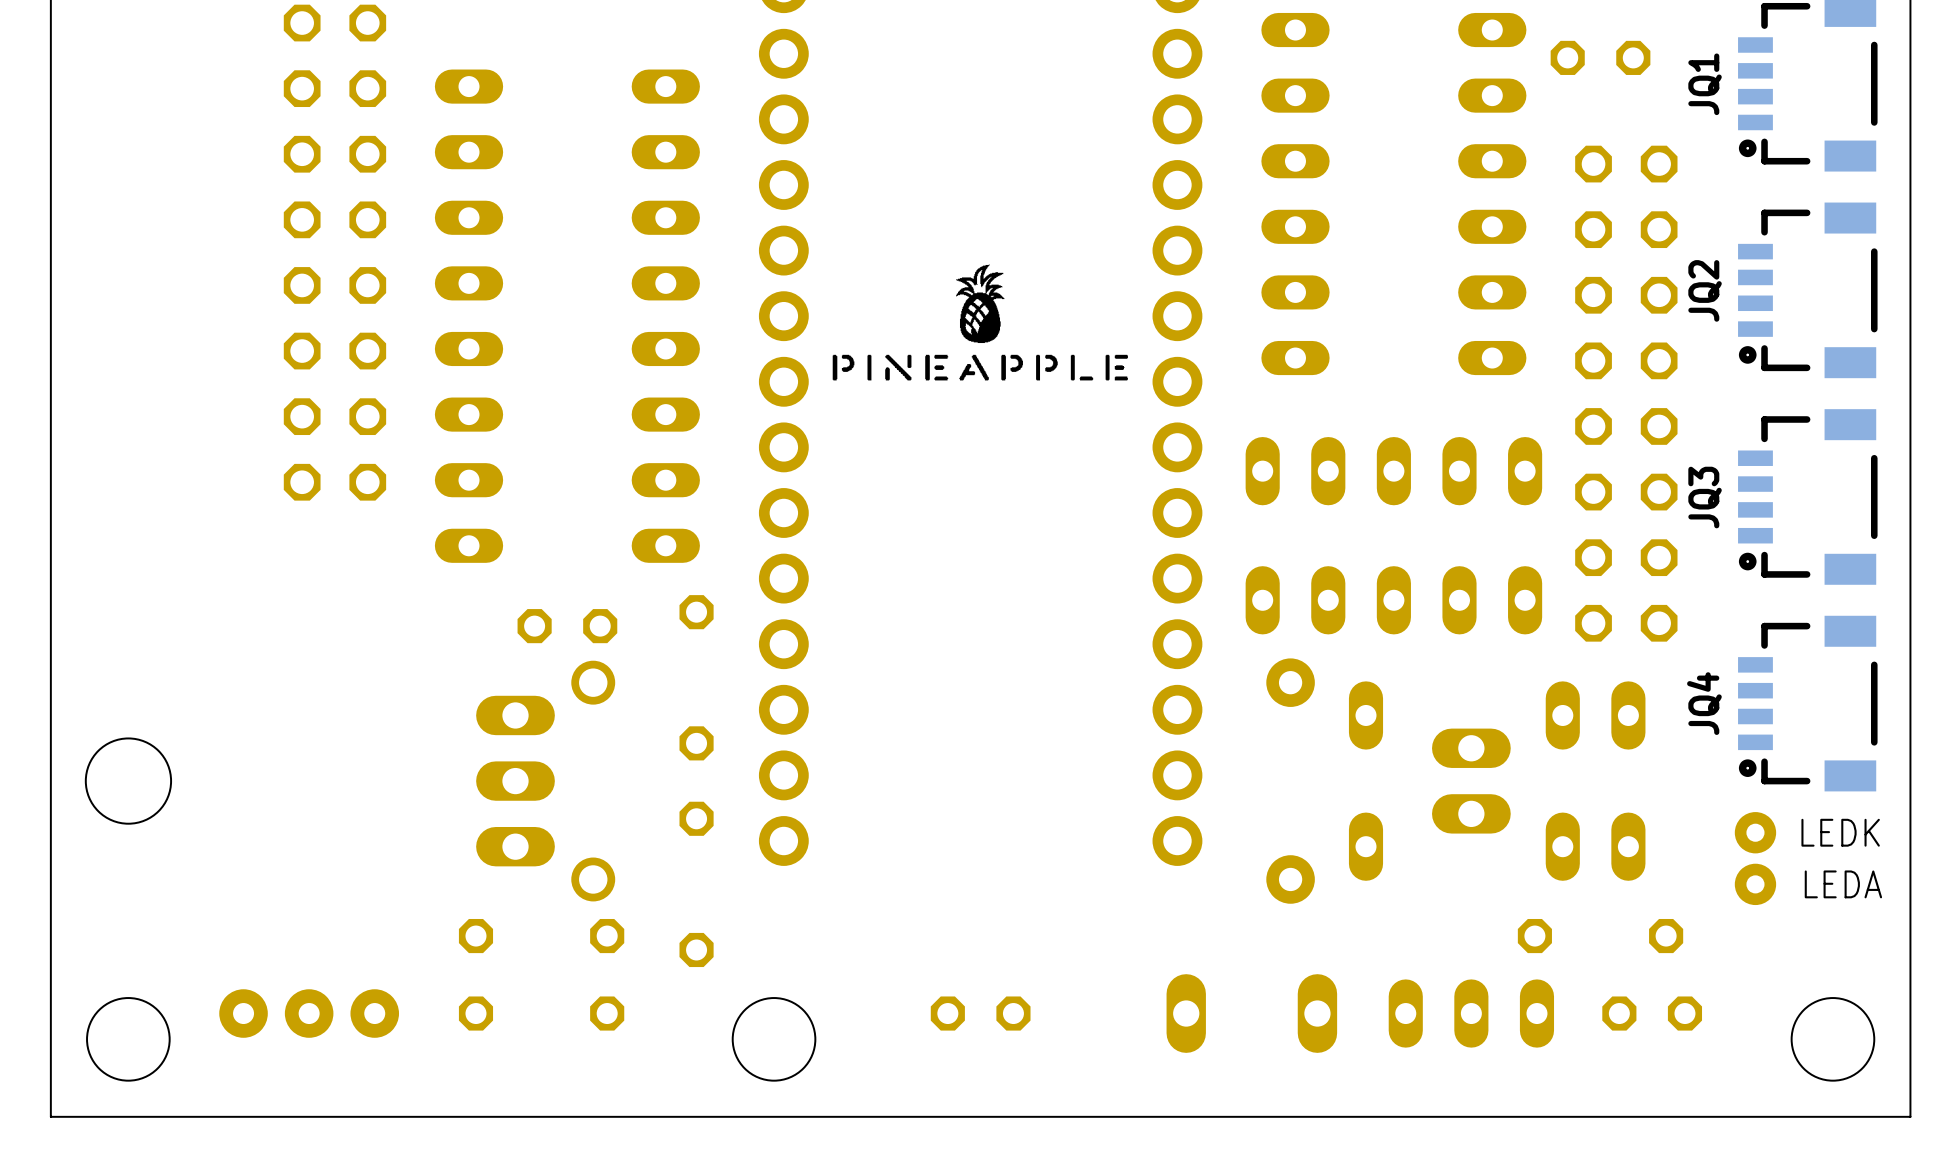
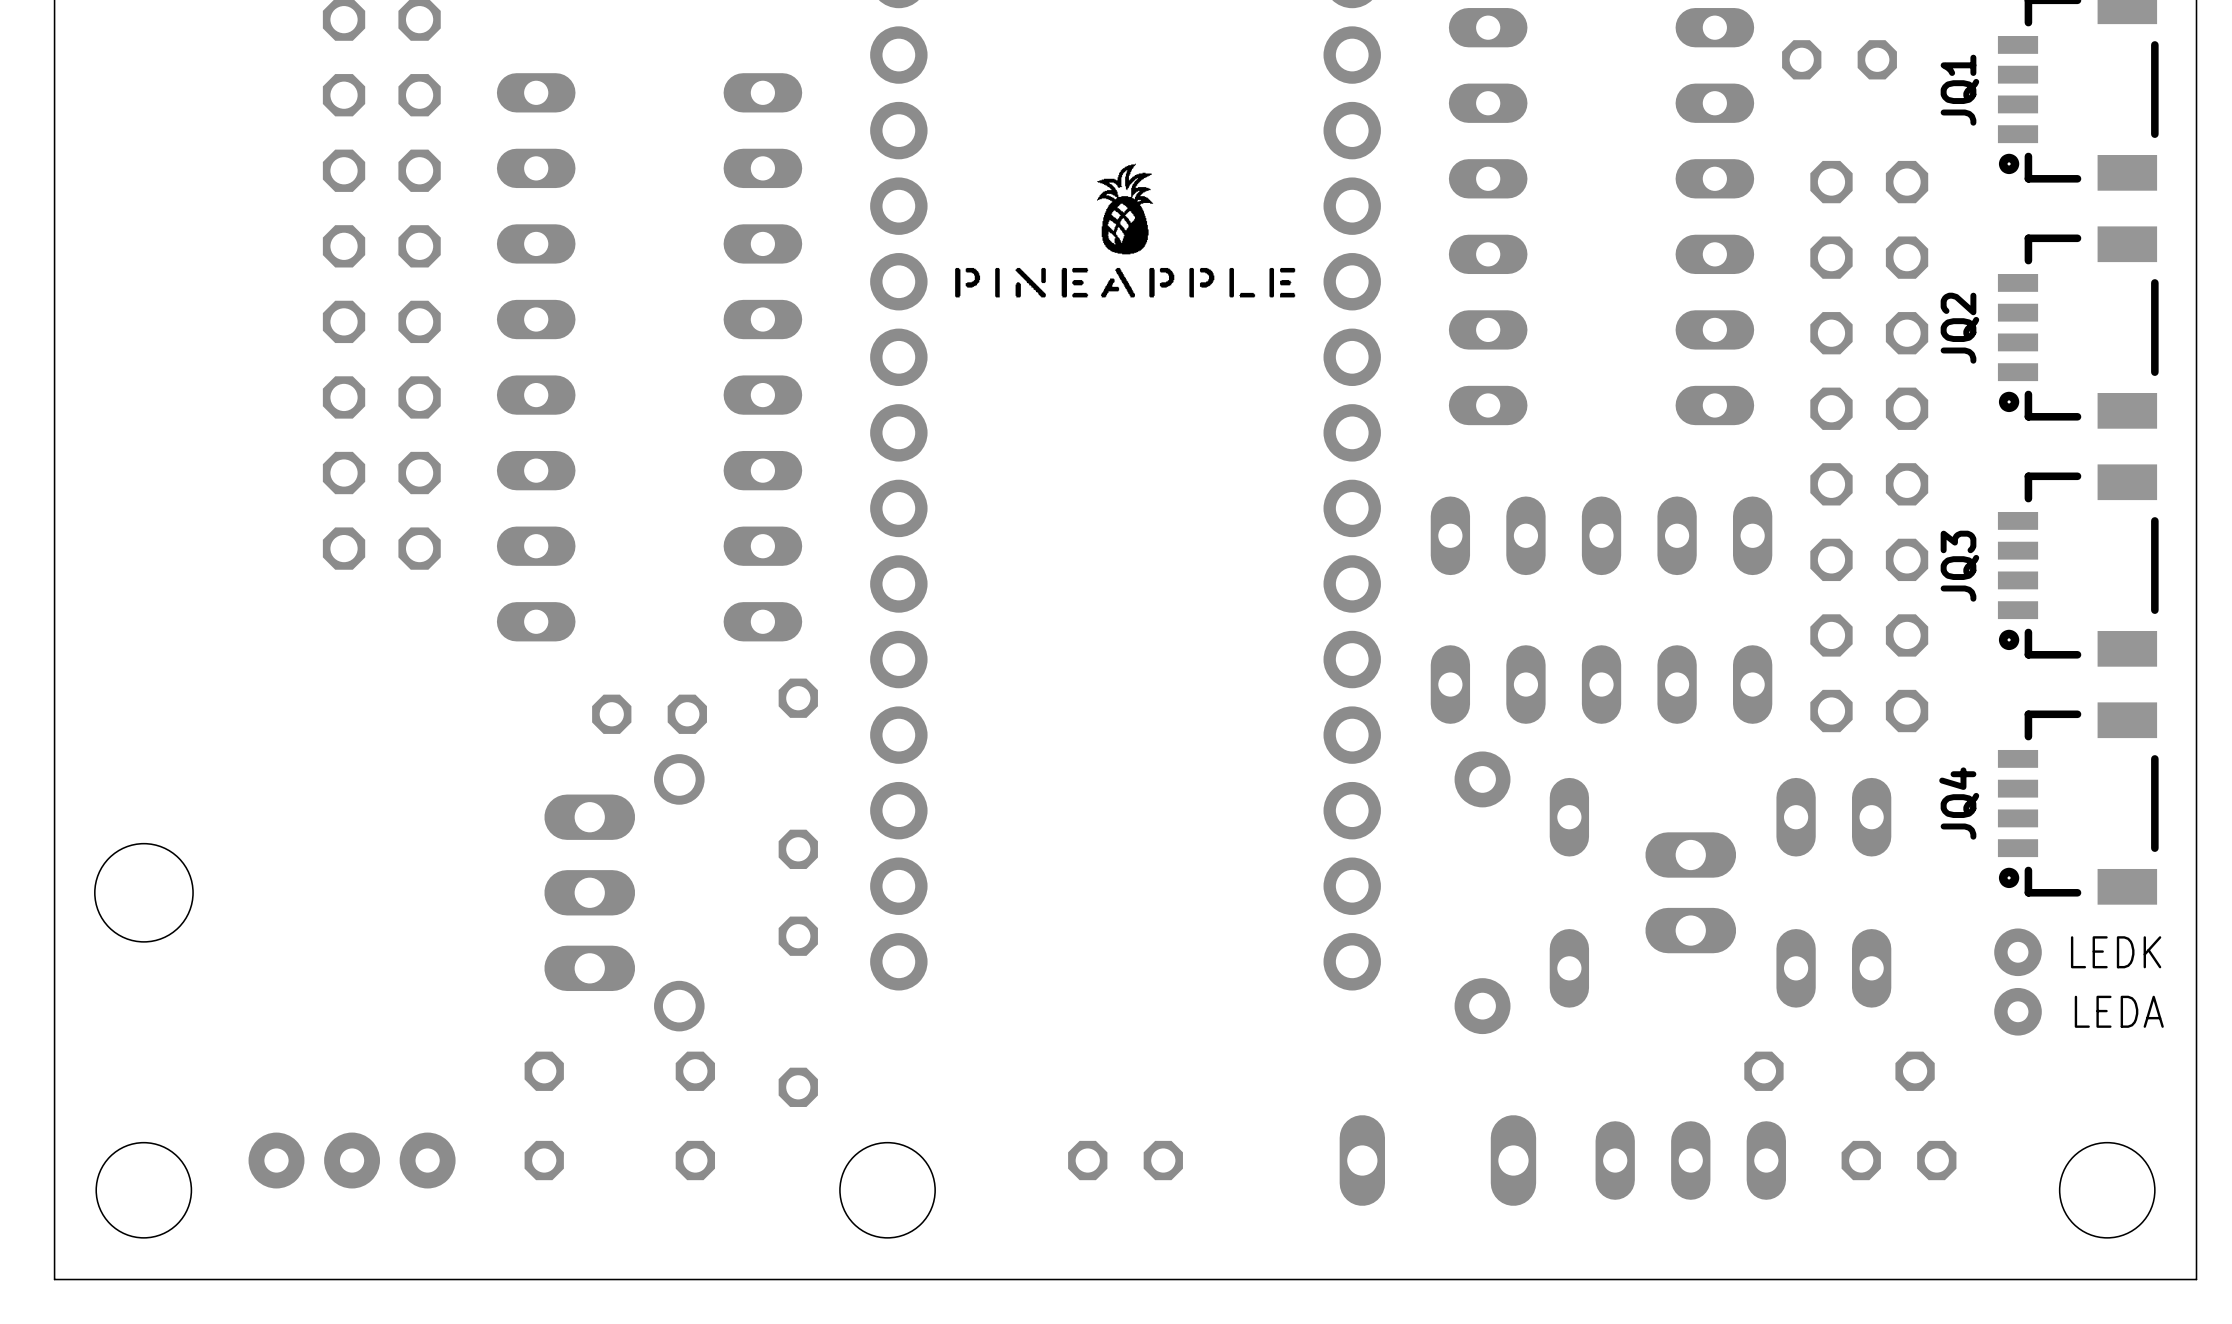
drawing position: (980, 322) -> (1125, 230)

